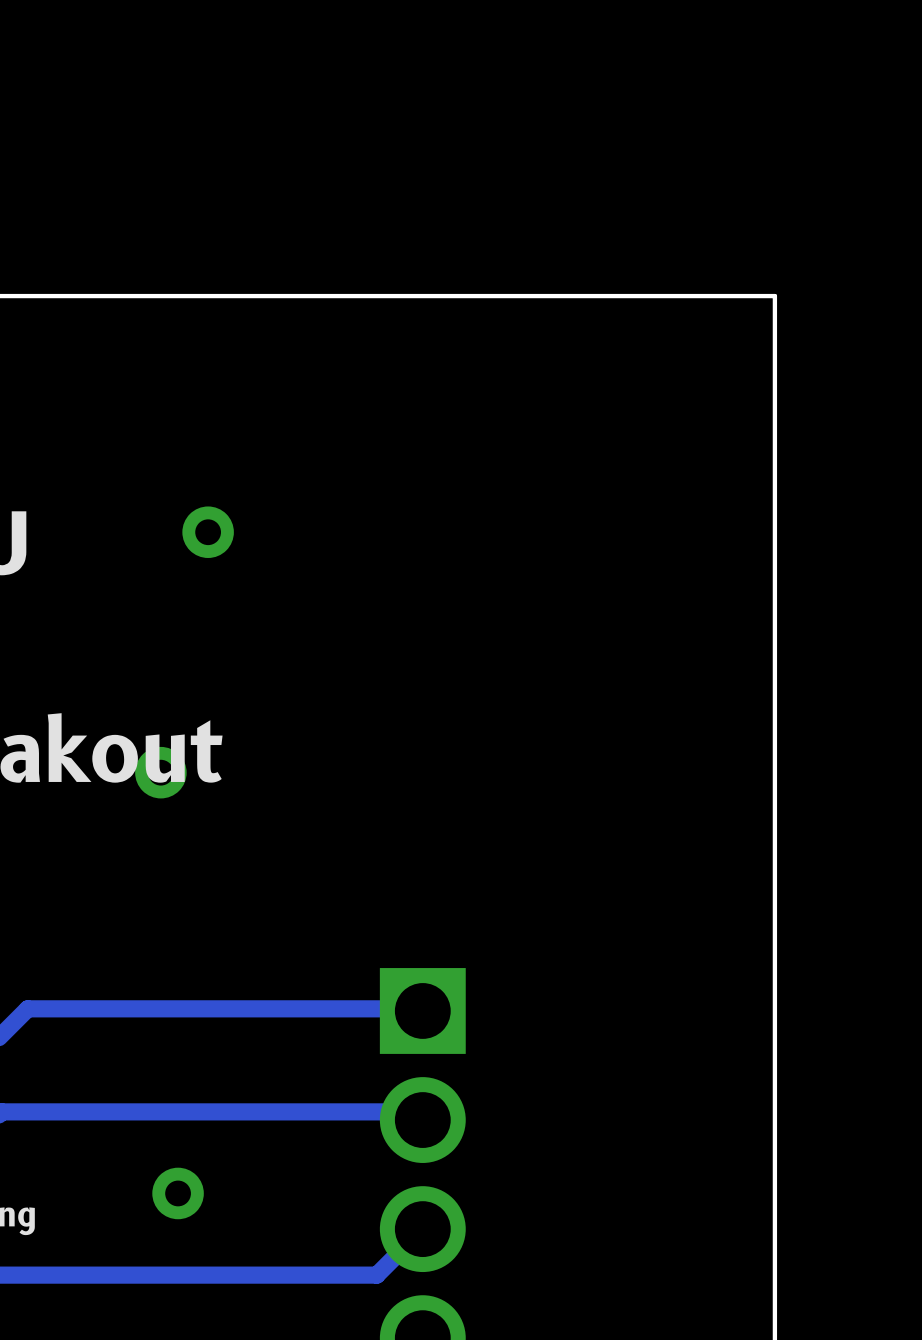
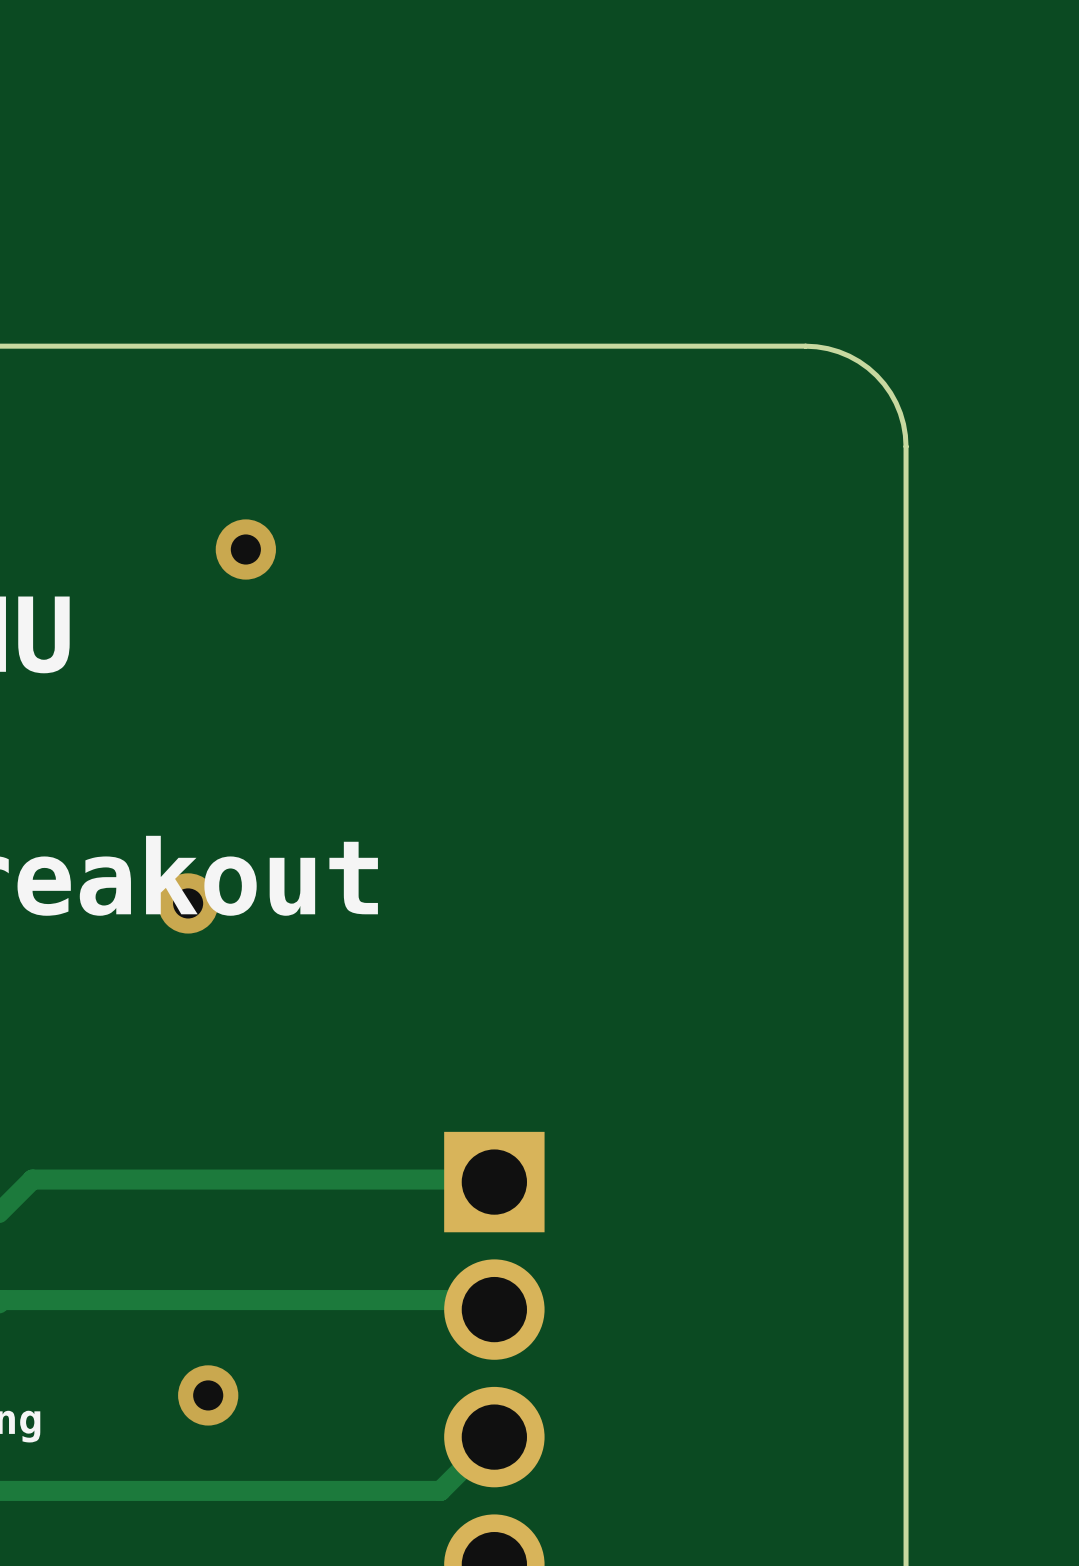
board edge: (689, 296) (774, 296) (774, 381) -> (805, 346) (827, 348) (849, 356) (876, 375) (896, 403) (903, 424) (906, 446)
via position: (208, 532) -> (245, 549)

